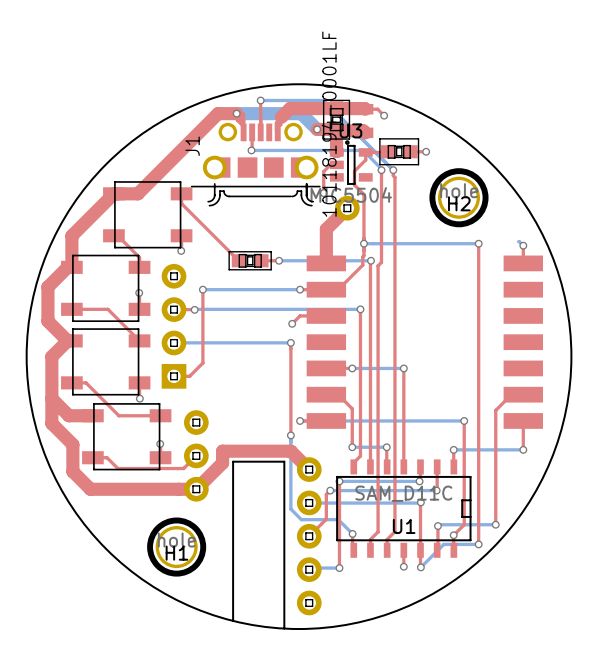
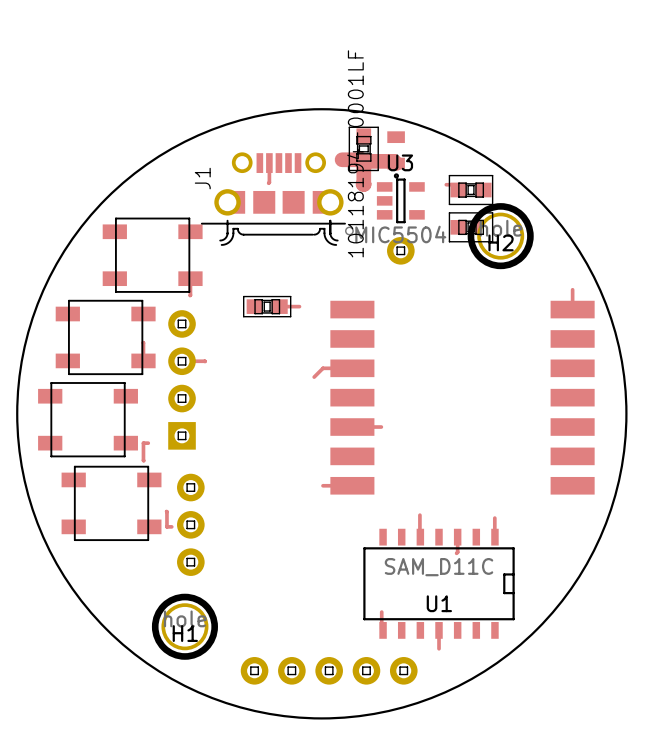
top track: (260, 100) (260, 132) -> none
bottom track: (260, 100) (323, 100) (393, 170) -> none
via: (260, 100) -> none
bottom track: (236, 113) (301, 113) (317, 129) -> none
via: (236, 113) -> none
top track: (243, 113) (243, 122) (237, 120) (243, 126) (243, 132) -> none
top track: (384, 115) (377, 109) (290, 108) (280, 117) (280, 124) (276, 122) (277, 132) -> none
via: (384, 115) -> none
top track: (243, 120) (236, 113) (218, 113) (137, 193) (113, 193) (71, 235) (71, 267) (67, 267) (47, 287) (47, 321) (67, 340) -> none
via: (317, 129) -> none
bottom track: (251, 150) (363, 150) (381, 170) -> none
via: (251, 150) -> none
top track: (388, 151) (365, 152) (365, 159) (354, 171) (354, 185) (363, 194) (362, 265) (338, 289) (300, 289) -> none
part: (399, 151) -> none
via: (426, 151) -> none
part: none -> (471, 190)
U3 position: (351, 162) -> (400, 198)
top track: (336, 164) (330, 164) (323, 171) (323, 193) -> none
top track: (381, 170) (381, 262) (378, 265) (378, 531) (370, 539) (370, 550) -> none
via: (381, 170) -> none
top track: (393, 170) (394, 177) (394, 531) (387, 539) (387, 550) -> none
via: (393, 170) -> none
part: none -> (471, 227)
top track: (181, 193) (181, 203) (239, 260) -> none
top track: (347, 208) (326, 229) (326, 263) -> none
part position: (347, 208) -> (400, 250)
top track: (113, 235) (117, 235) (139, 257) (139, 267) -> none
bottom track: (518, 241) (523, 245) -> none
bottom track: (363, 243) (478, 243) -> none
via: (363, 243) -> none
top track: (478, 243) (478, 544) -> none
via: (478, 243) -> none
via: (523, 245) -> none
via: (181, 250) -> none
bottom track: (279, 260) (370, 260) -> none
via: (279, 260) -> none
top track: (370, 260) (370, 466) -> none
via: (370, 260) -> none
top track: (202, 289) (202, 363) (189, 376) (174, 376) -> none
bottom track: (202, 289) (300, 289) -> none
via: (202, 289) -> none
via: (300, 289) -> none
via: (139, 292) -> none
top track: (71, 309) (107, 309) (139, 340) -> none
via: (194, 309) -> none
top track: (360, 309) (360, 456) (353, 462) (353, 466) -> none
bottom track: (360, 309) (194, 309) -> none
via: (360, 309) -> none
via: (292, 323) -> none
top track: (67, 340) (51, 356) (51, 423) (72, 444) (72, 471) (90, 489) (196, 489) (222, 463) (222, 451) (290, 451) (309, 469) -> none
bottom track: (174, 342) (290, 342) -> none
top track: (290, 342) (290, 435) -> none
via: (290, 342) -> none
part position: (105, 361) -> (88, 419)
bottom track: (352, 368) (403, 368) -> none
via: (352, 368) -> none
top track: (403, 368) (403, 466) -> none
via: (403, 368) -> none
top track: (71, 382) (86, 382) (118, 415) (160, 415) -> none
top track: (326, 394) (338, 394) (352, 408) (352, 447) -> none
top track: (523, 394) (511, 394) (495, 410) (495, 524) -> none
top track: (51, 398) (68, 415) (92, 415) -> none
via: (139, 398) -> none
bottom track: (300, 420) (464, 420) -> none
via: (300, 420) -> none
top track: (464, 420) (464, 524) (453, 535) (453, 550) -> none
via: (464, 420) -> none
top track: (523, 420) (523, 449) -> none
bottom track: (290, 435) (290, 509) (301, 519) (338, 519) (352, 533) -> none
via: (290, 435) -> none
part position: (126, 436) -> (111, 503)
via: (160, 443) -> none
bottom track: (352, 447) (386, 447) -> none
via: (352, 447) -> none
via: (386, 447) -> none
bottom track: (453, 449) (523, 449) -> none
via: (453, 449) -> none
via: (523, 449) -> none
top track: (196, 455) (183, 468) (117, 468) (107, 457) (92, 457) -> none
part position: (196, 455) -> (190, 524)
top track: (437, 466) (436, 490) -> none
top track: (339, 481) (339, 568) -> none
bottom track: (339, 481) (419, 481) -> none
via: (339, 481) -> none
via: (419, 481) -> none
top track: (330, 490) (326, 494) (326, 519) (309, 536) -> none
bottom track: (330, 490) (436, 490) -> none
via: (330, 490) -> none
via: (436, 490) -> none
top track: (420, 502) (420, 567) -> none
bottom track: (420, 502) (309, 503) -> none
via: (420, 502) -> none
bottom track: (495, 524) (437, 526) -> none
via: (495, 524) -> none
top track: (437, 526) (437, 550) -> none
via: (437, 526) -> none
via: (352, 533) -> none
via: (453, 535) -> none
part rotation: 0° (309, 536) -> 90° clockwise (329, 670)
bottom track: (478, 544) (443, 544) (420, 567) -> none
via: (478, 544) -> none
via: (403, 566) -> none
via: (420, 567) -> none
bottom track: (339, 568) (309, 569) -> none
via: (339, 568) -> none
board edge: (233, 620) (233, 461) (284, 461) (284, 628) -> none

